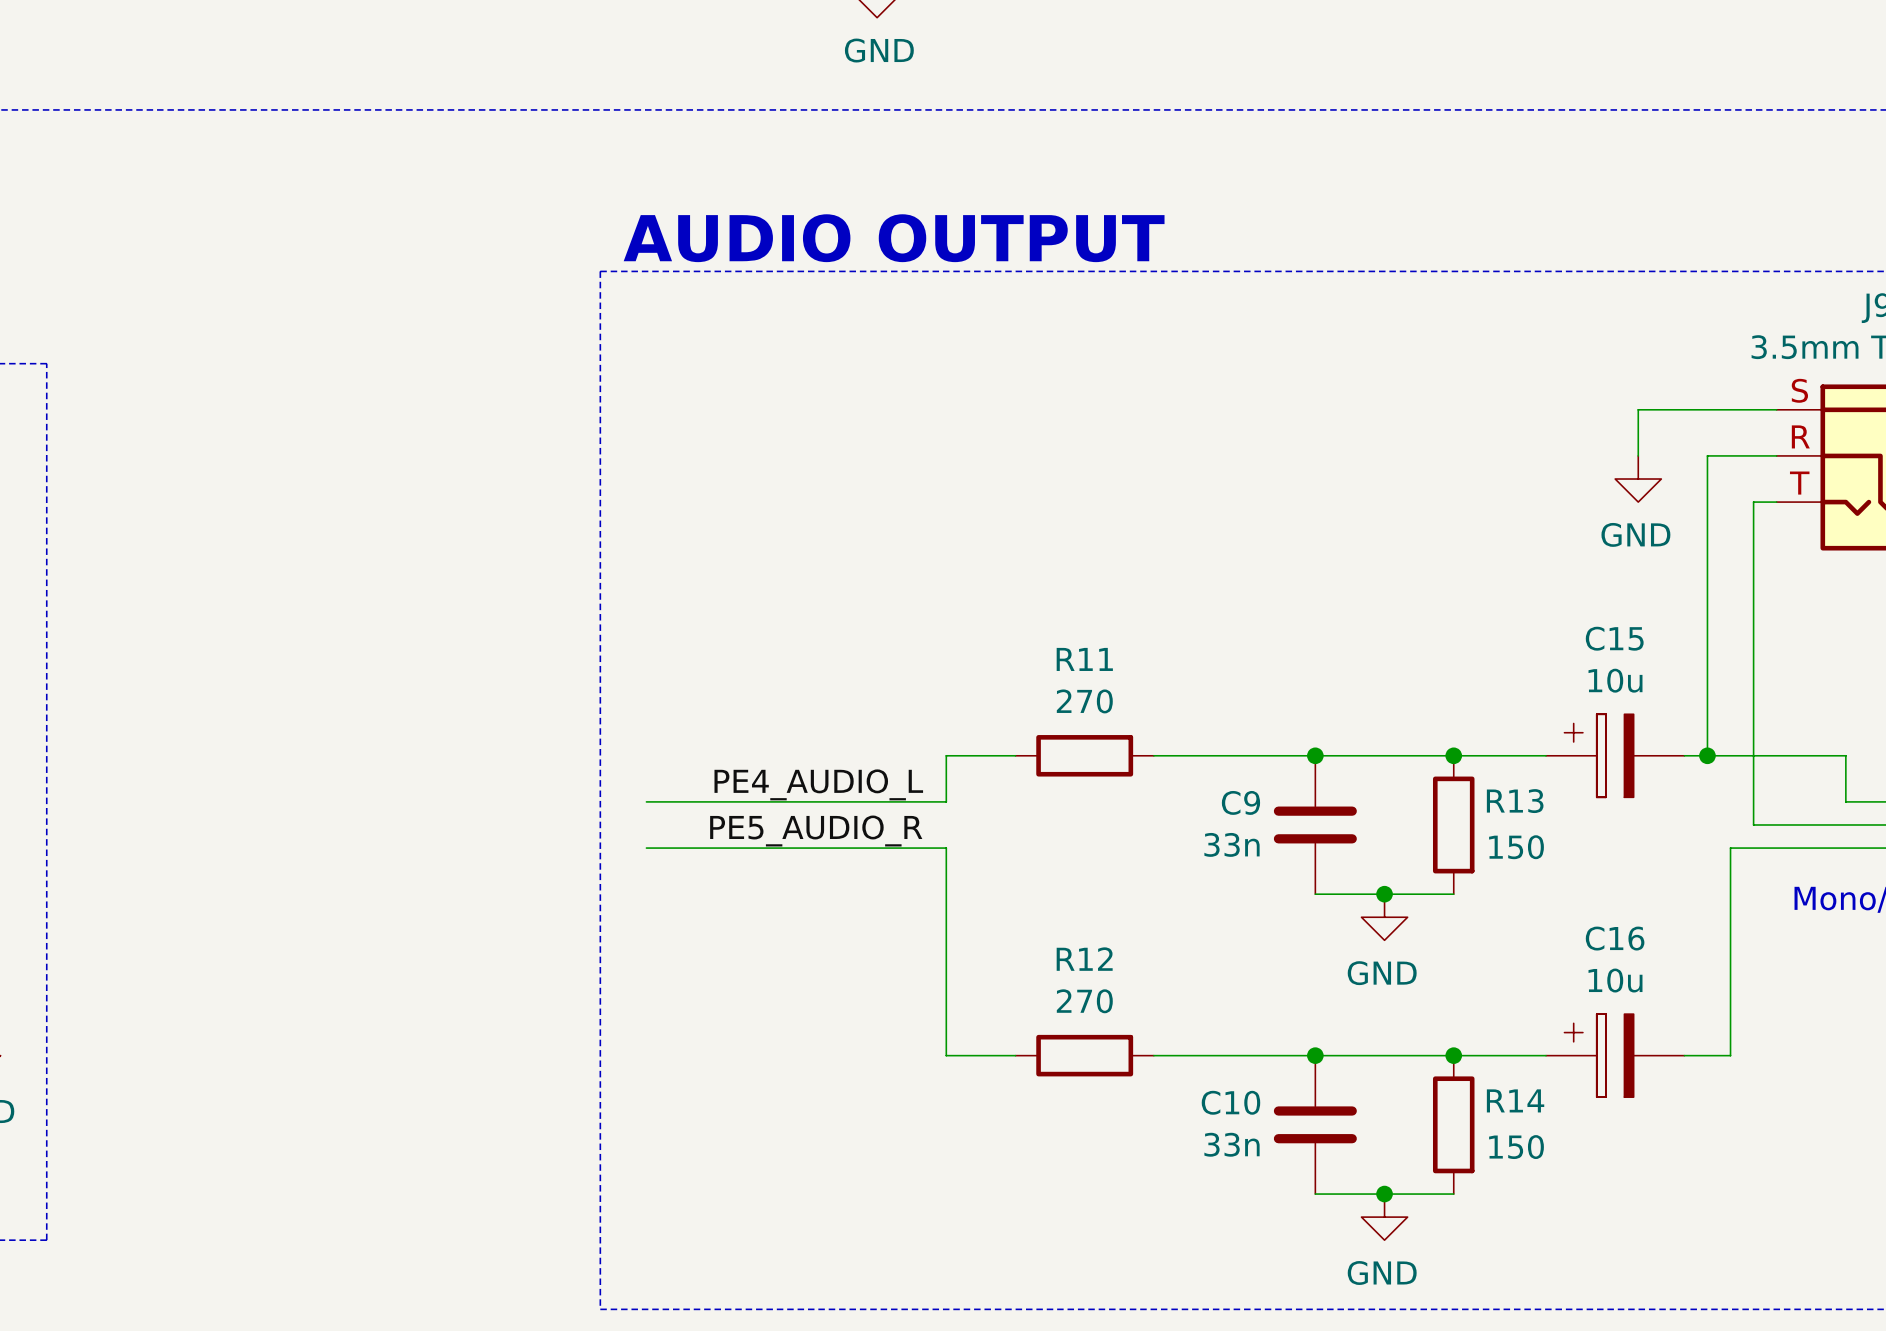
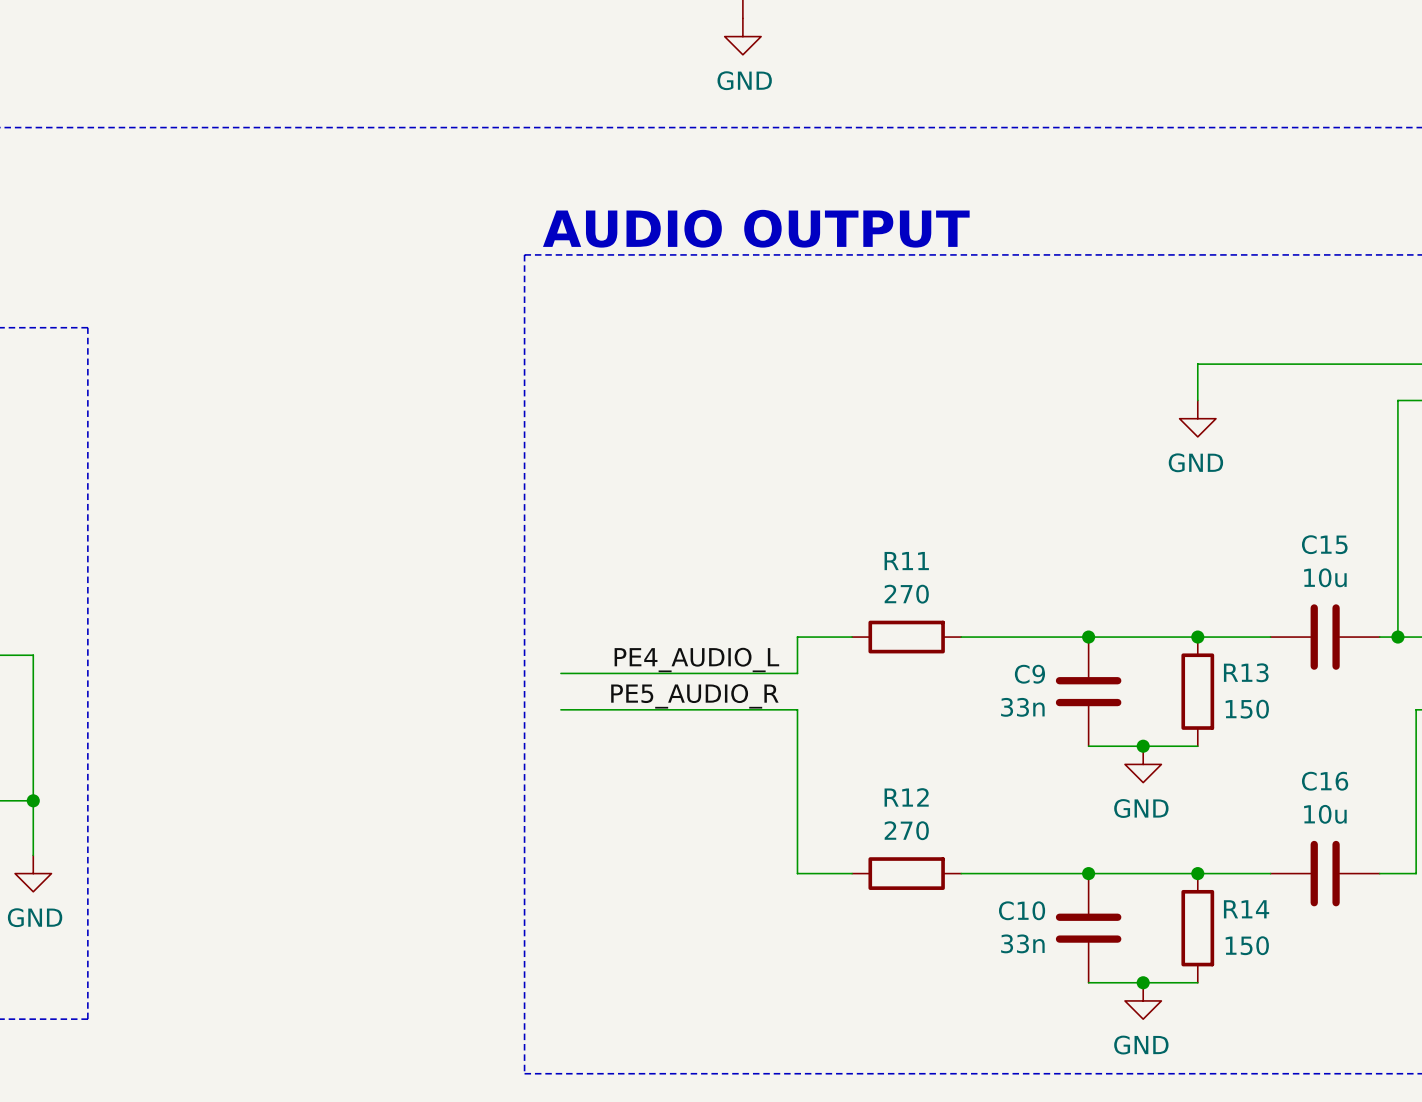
wire: (1638, 409) (1638, 455) -> (1343, 364) (1197, 364) (1197, 400)
power symbol position: GND (1638, 479) -> GND (1197, 418)
C15 symbol: [1546, 714, 1685, 798] -> [1270, 604, 1380, 670]
C16 symbol: [1546, 1014, 1685, 1098] -> [1270, 840, 1380, 907]

